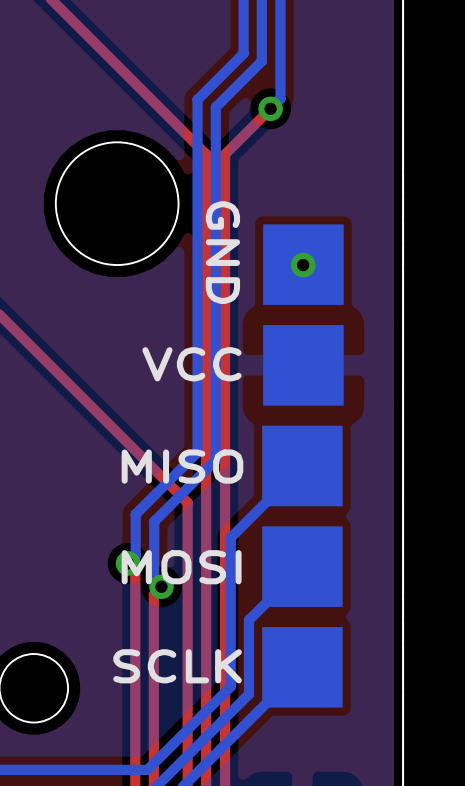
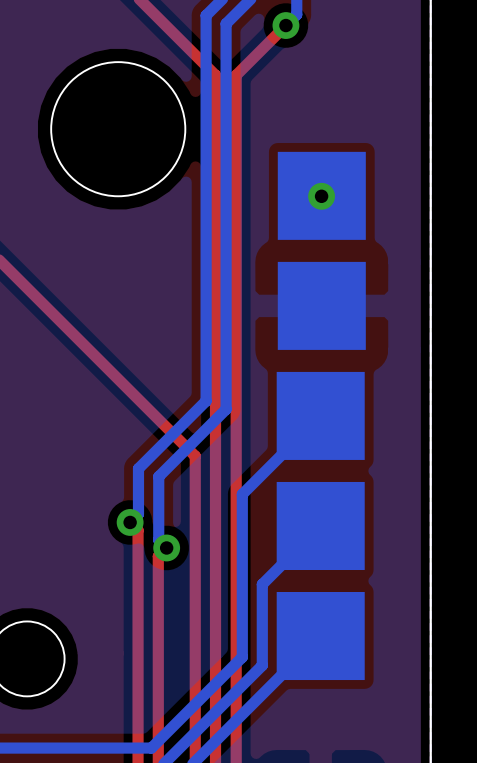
text: GND (222, 252) -> none
text: VCC (191, 364) -> none
text: MISO (182, 466) -> none
text: MOSI (181, 567) -> none
text: SCLK (177, 666) -> none

